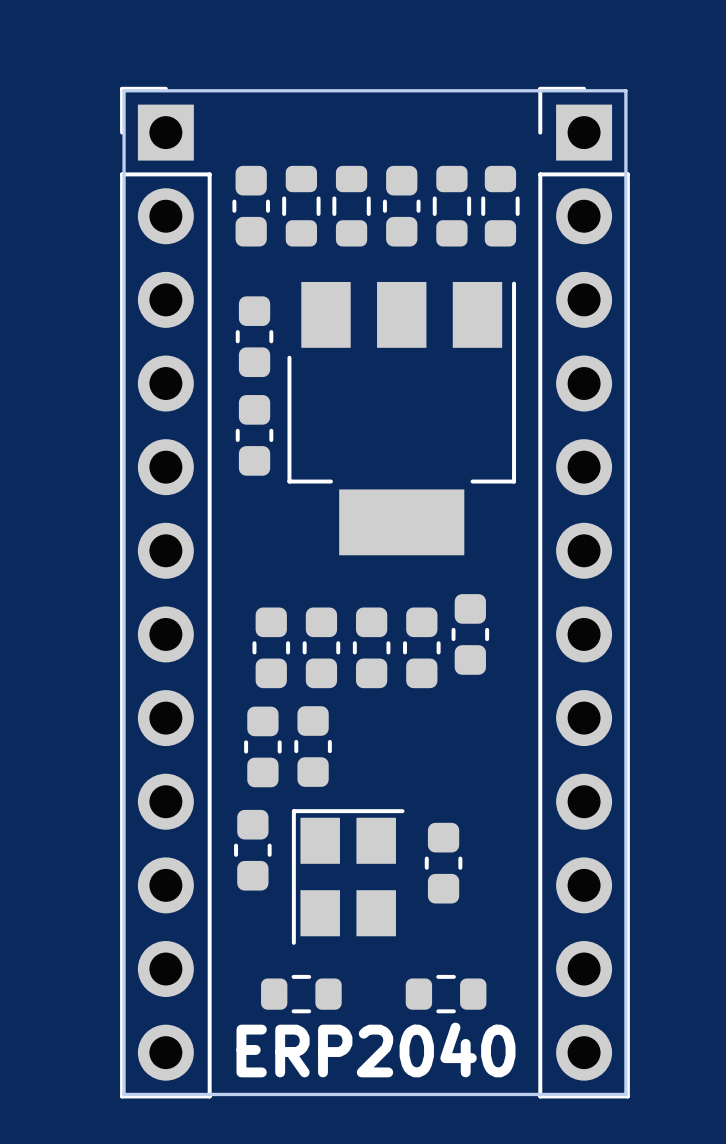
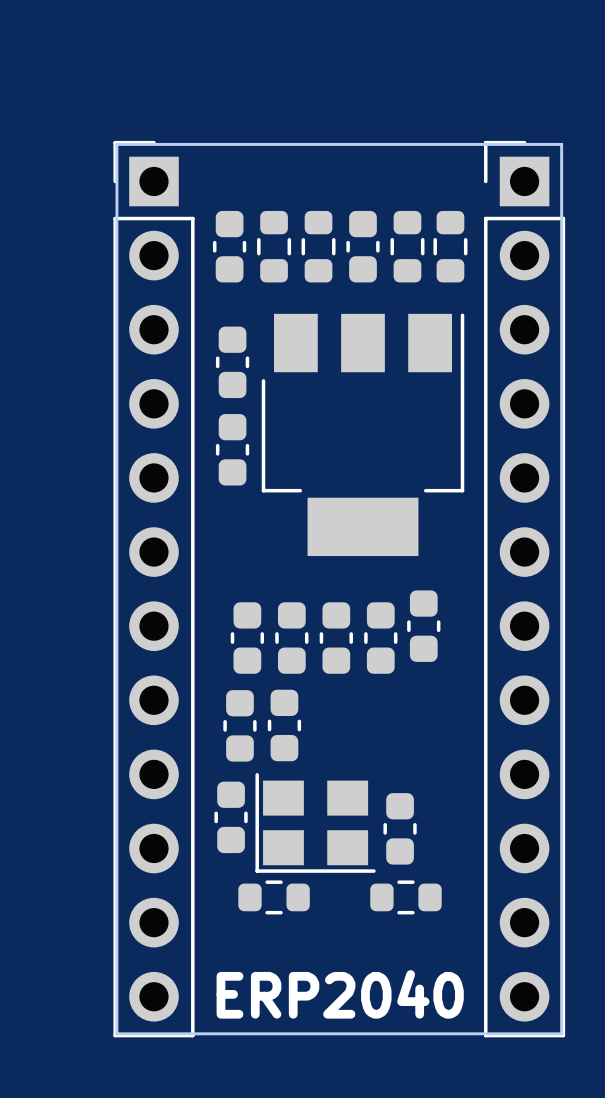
part rotation: 0° (348, 877) -> 90° counterclockwise (315, 822)
part position: (301, 994) -> (274, 897)
part position: (446, 994) -> (405, 897)

